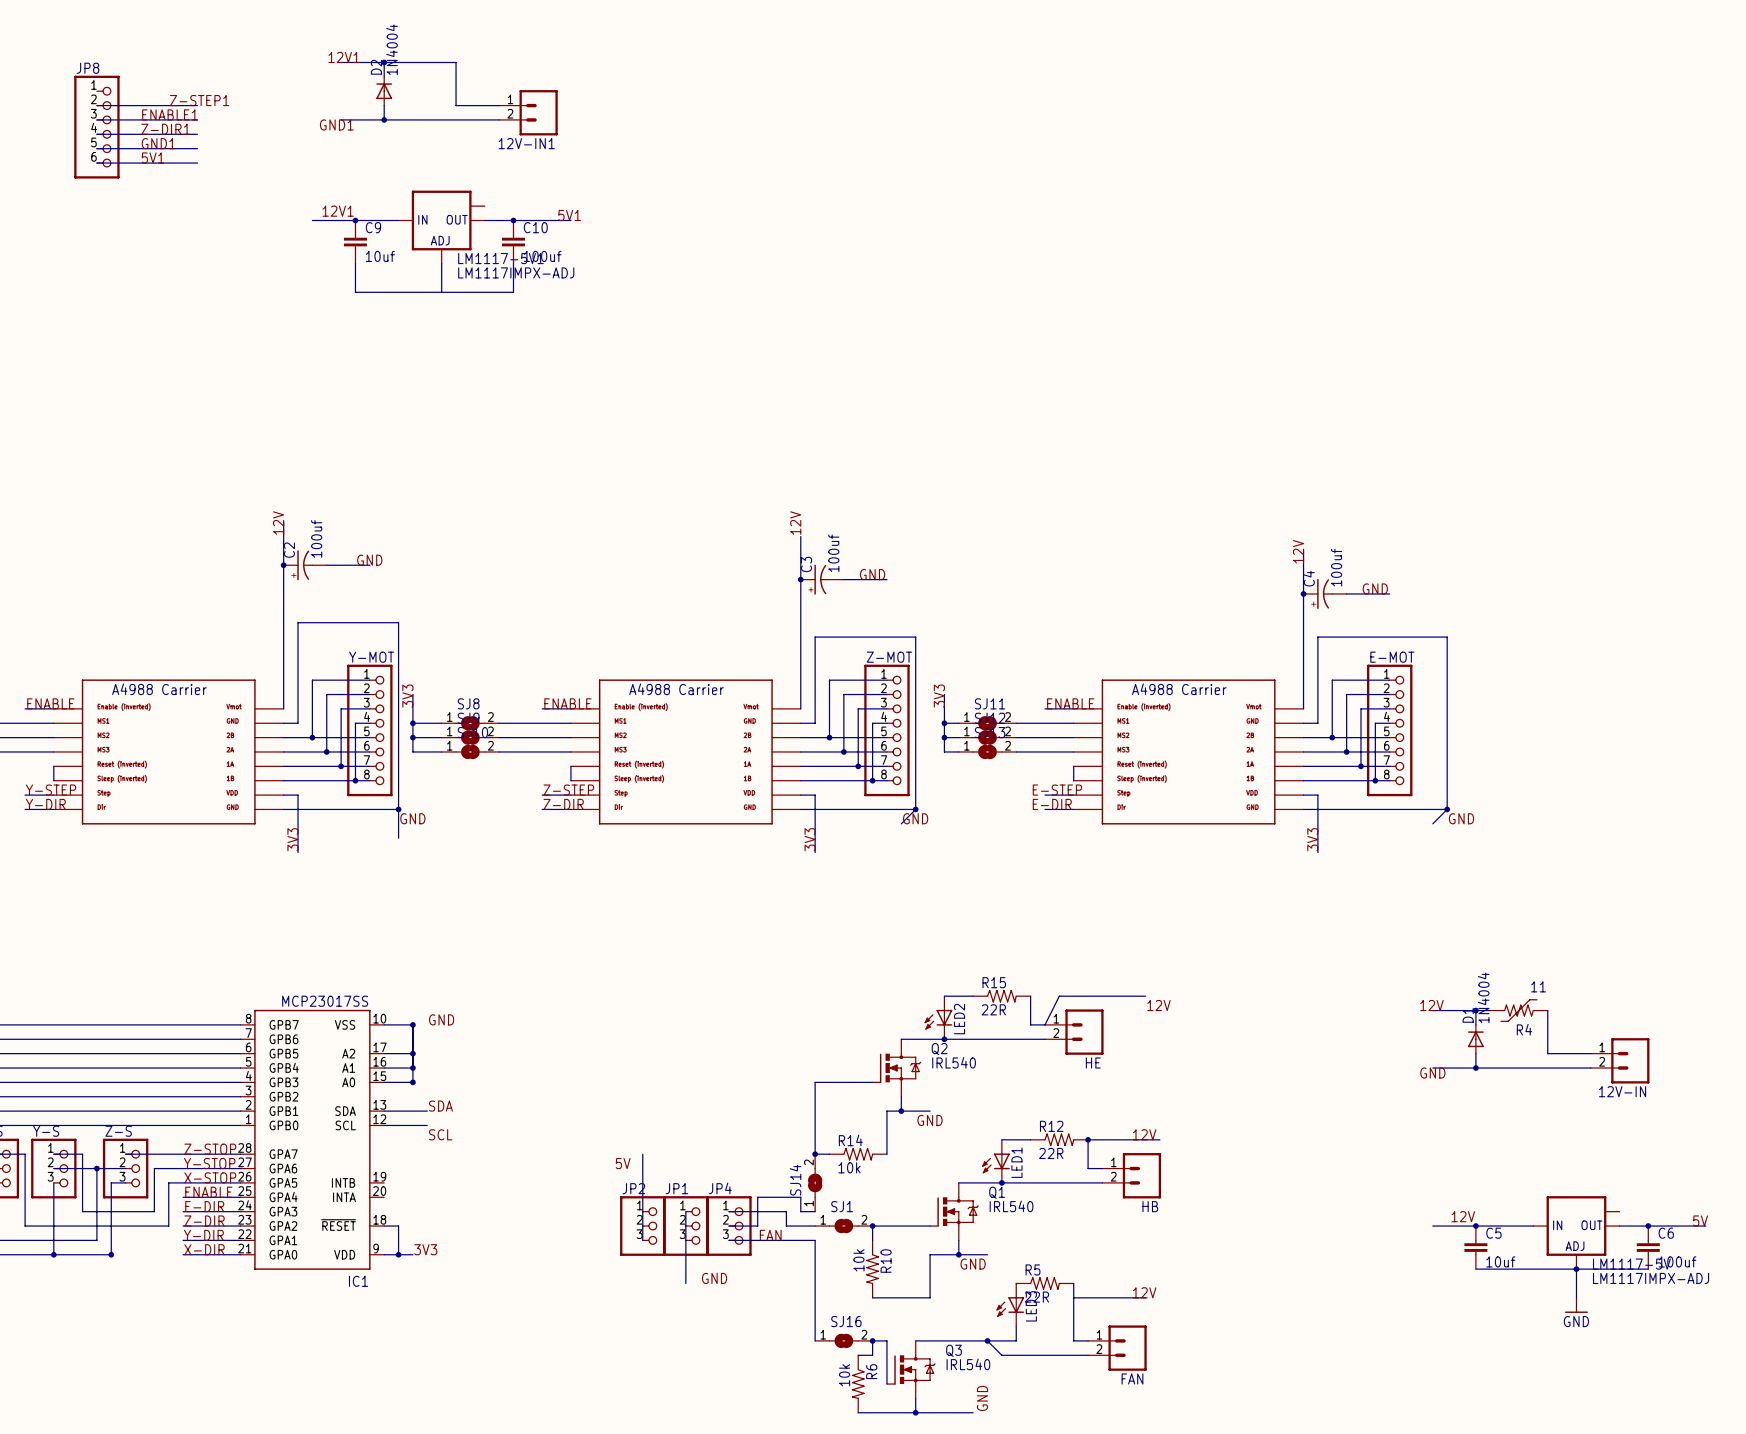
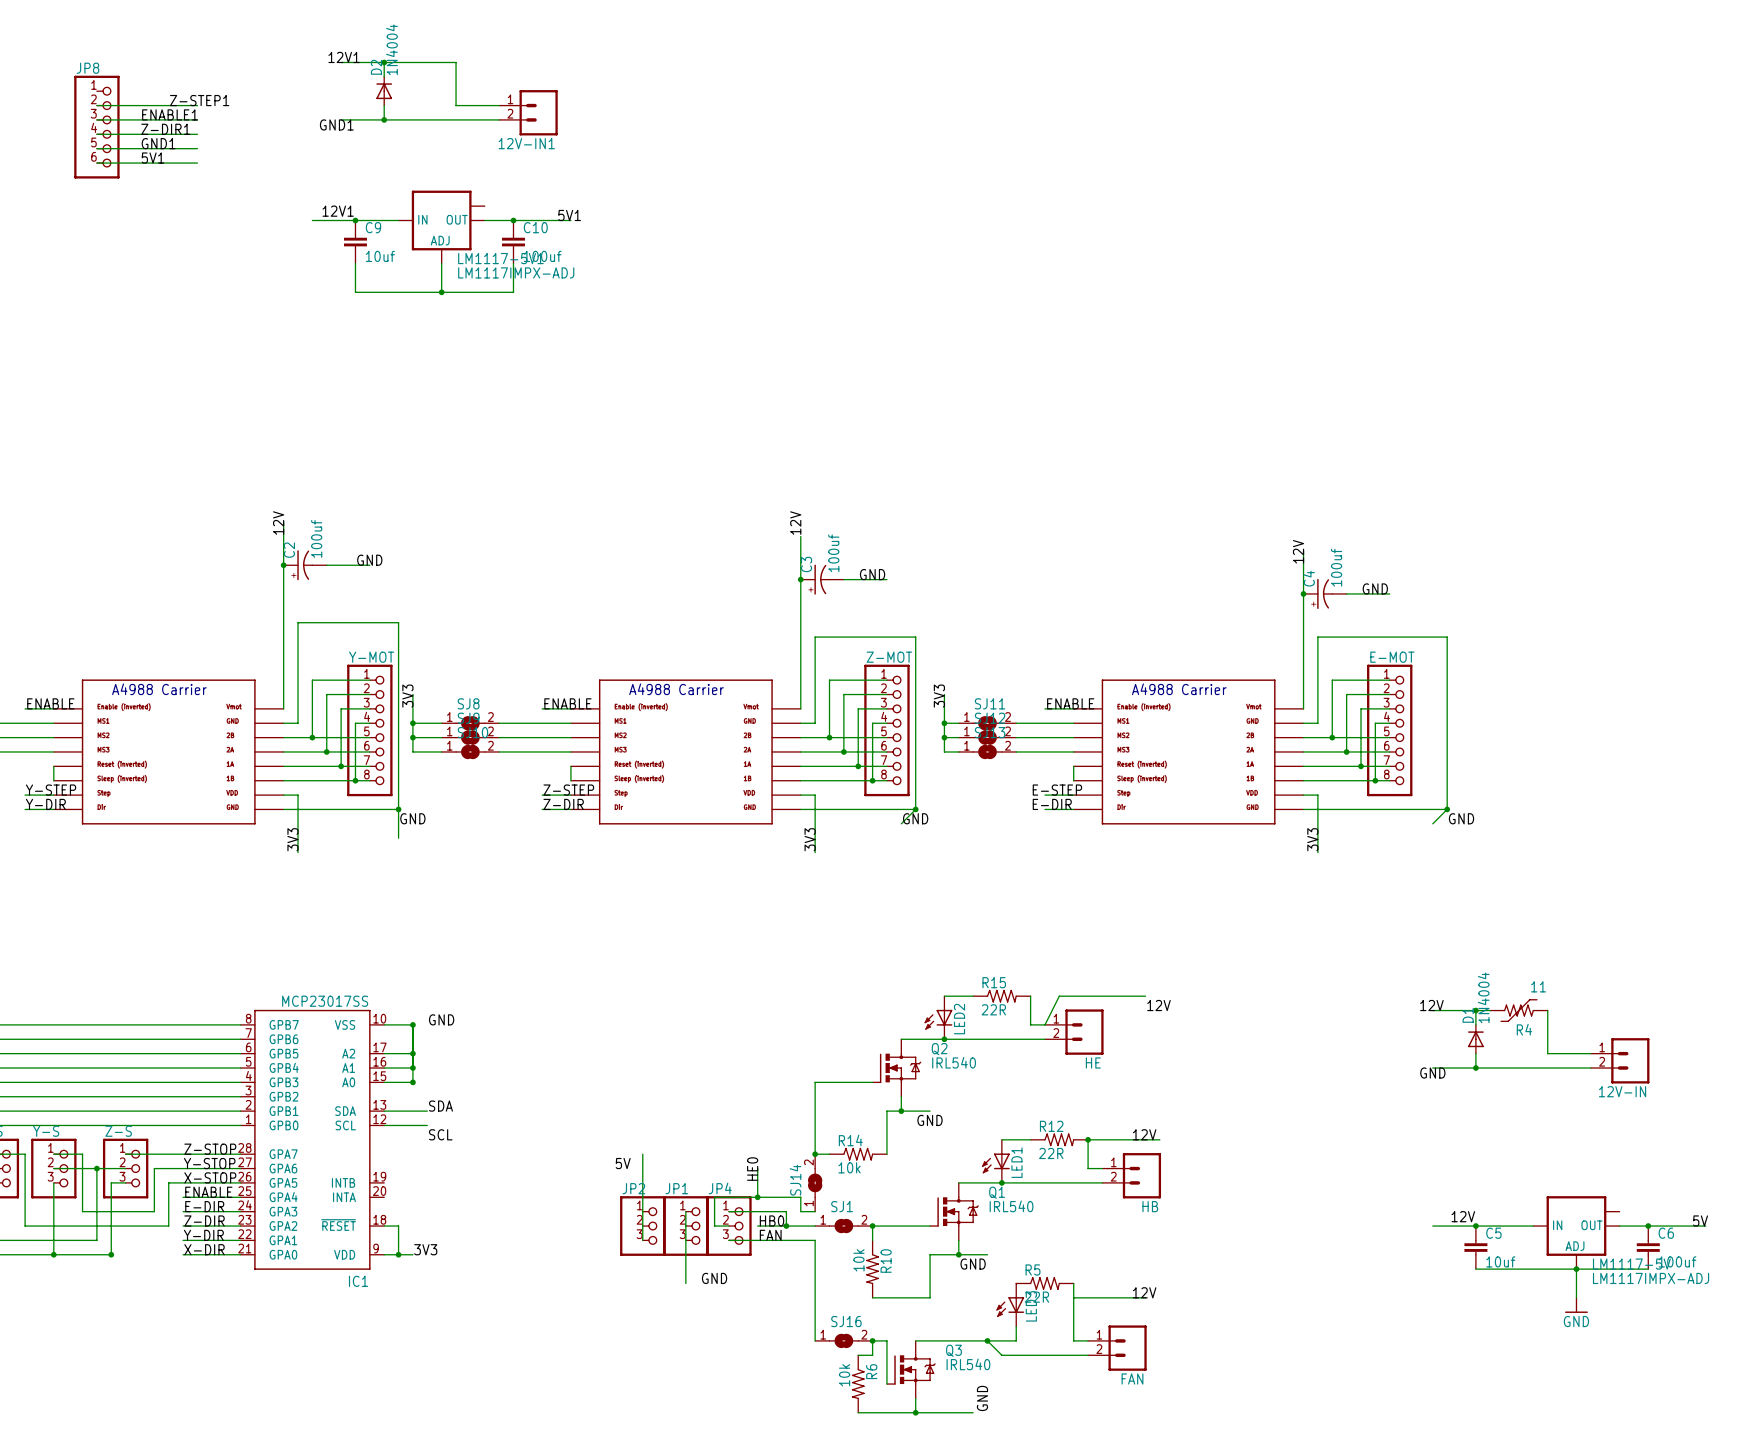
junction: none -> (441, 292)
label: none -> HE0 (752, 1169)
wire: (757, 1197) (757, 1226) (728, 1226) -> (757, 1168) (757, 1197) (714, 1197) (714, 1226) (728, 1226)
junction: none -> (757, 1197)
label: none -> HB0 (772, 1220)
wire: none -> (757, 1226) (786, 1226)
junction: none -> (786, 1226)

